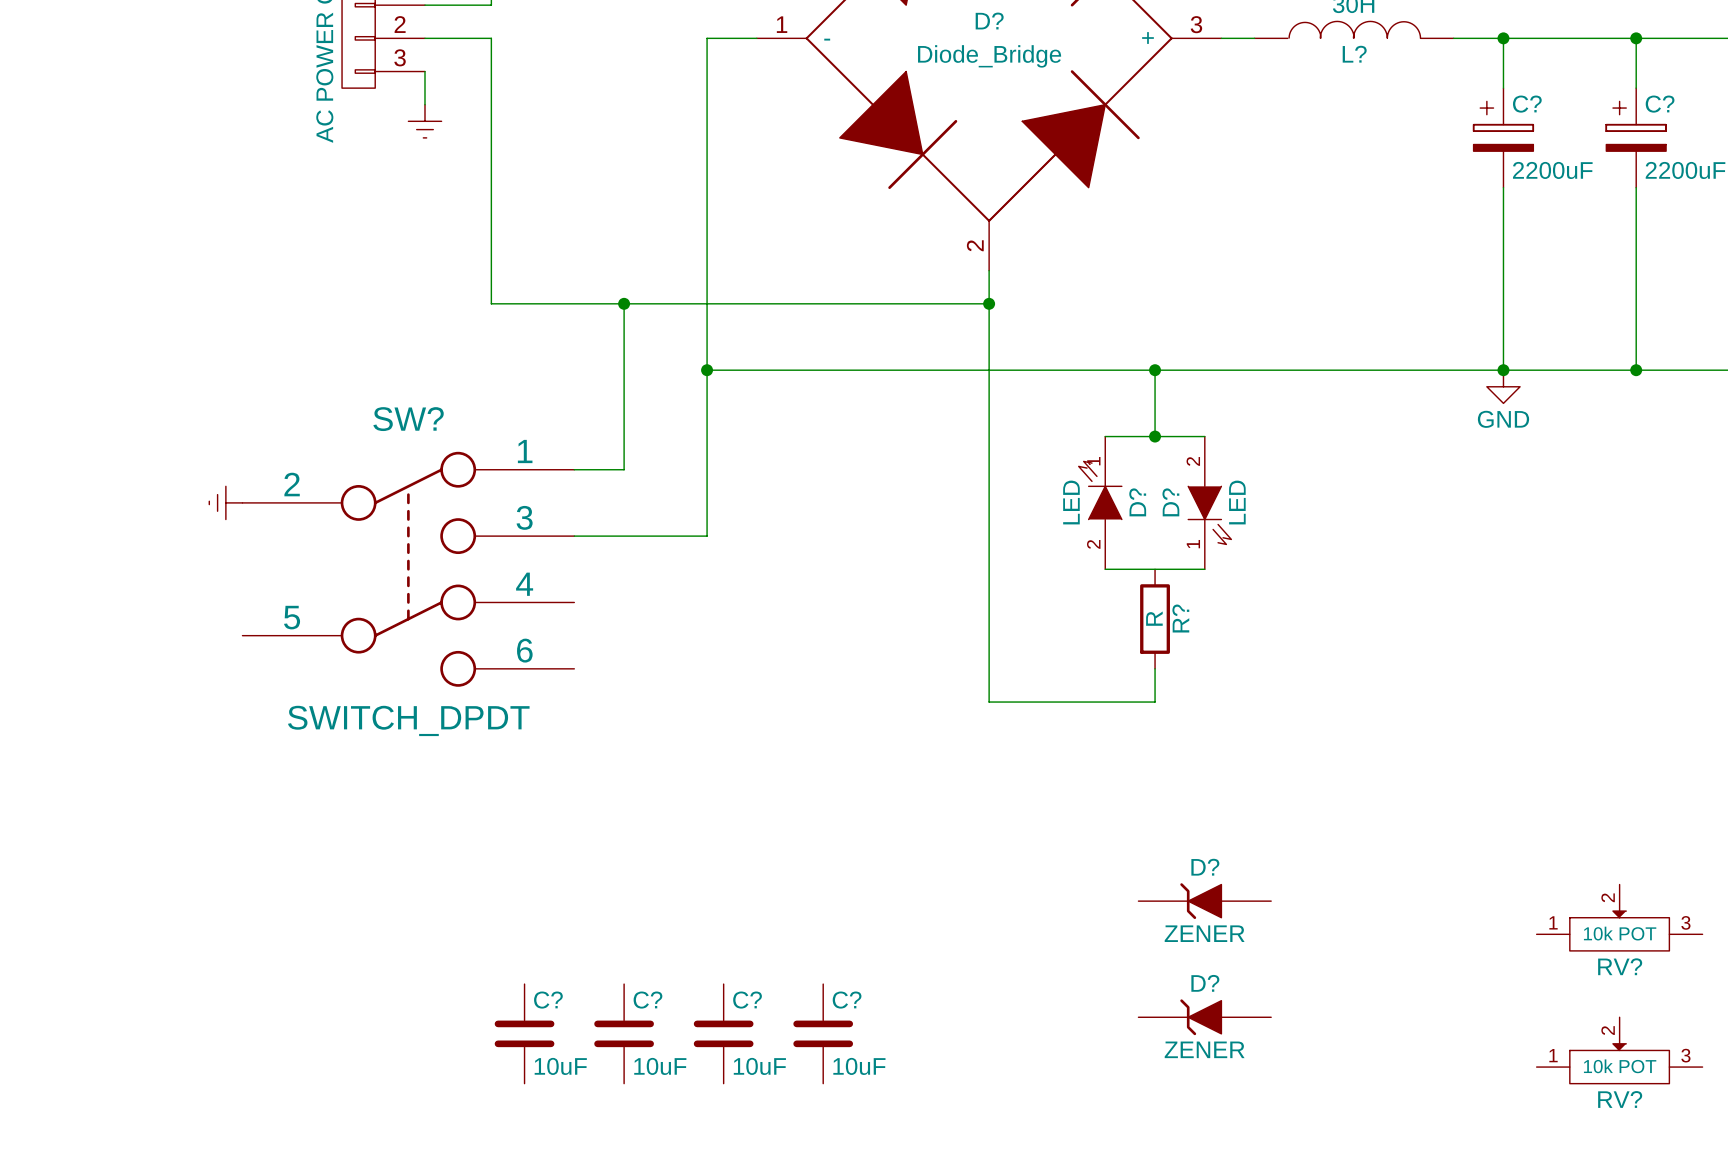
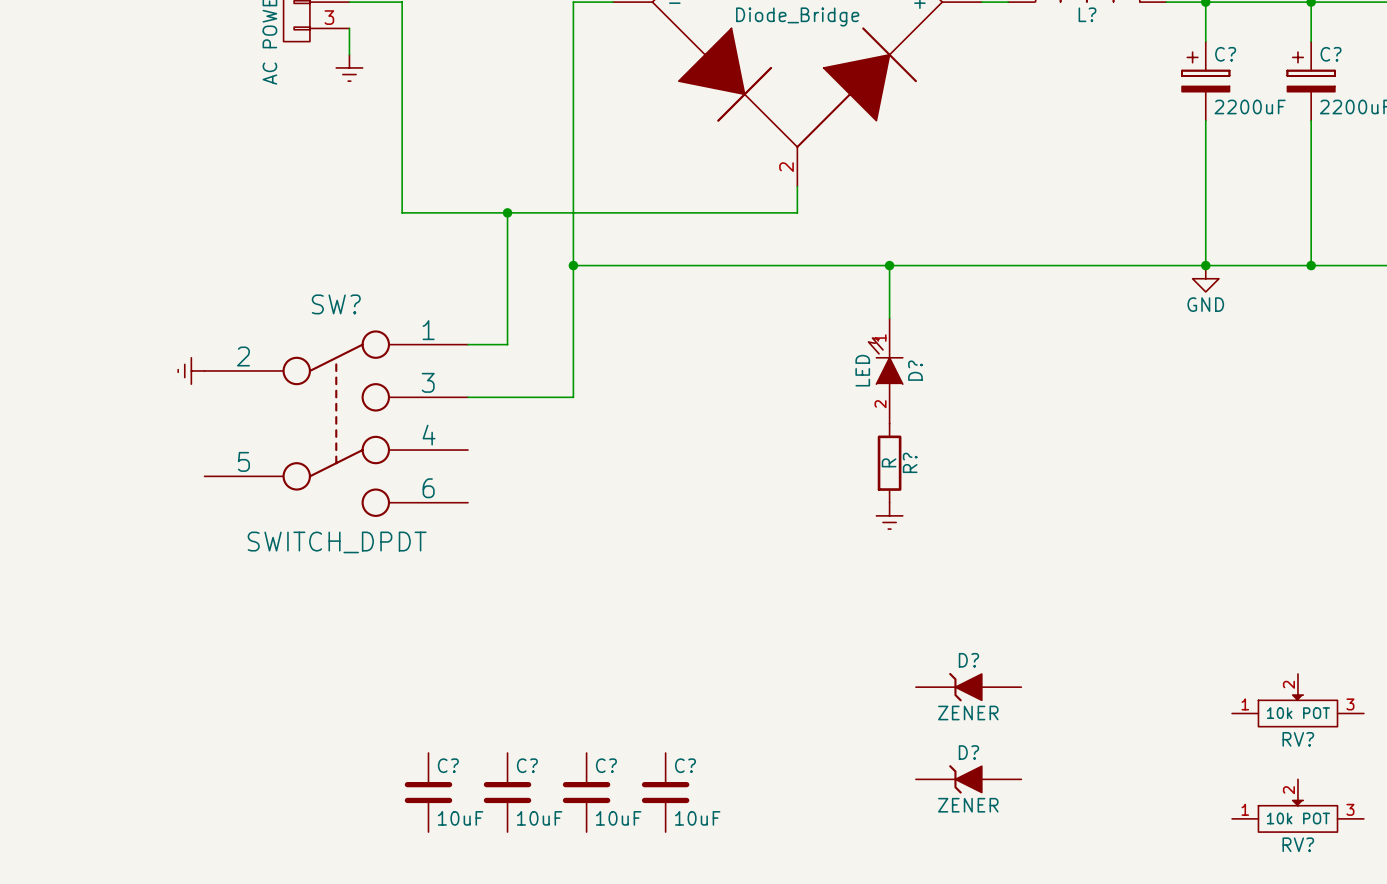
wire: (989, 303) (989, 702) (1155, 702) (1155, 668) -> none
junction: (989, 303) -> none
junction: none -> (889, 265)
wire: (1155, 370) (1155, 436) -> none
junction: (1155, 370) -> none
wire: (1105, 436) (1204, 436) -> (889, 318) (889, 265)
junction: (1155, 436) -> none
D?: LED (1209, 502) -> none
wire: (1105, 569) (1204, 569) -> none
R? position: (1155, 619) -> (889, 463)
power symbol: none -> (889, 515)

